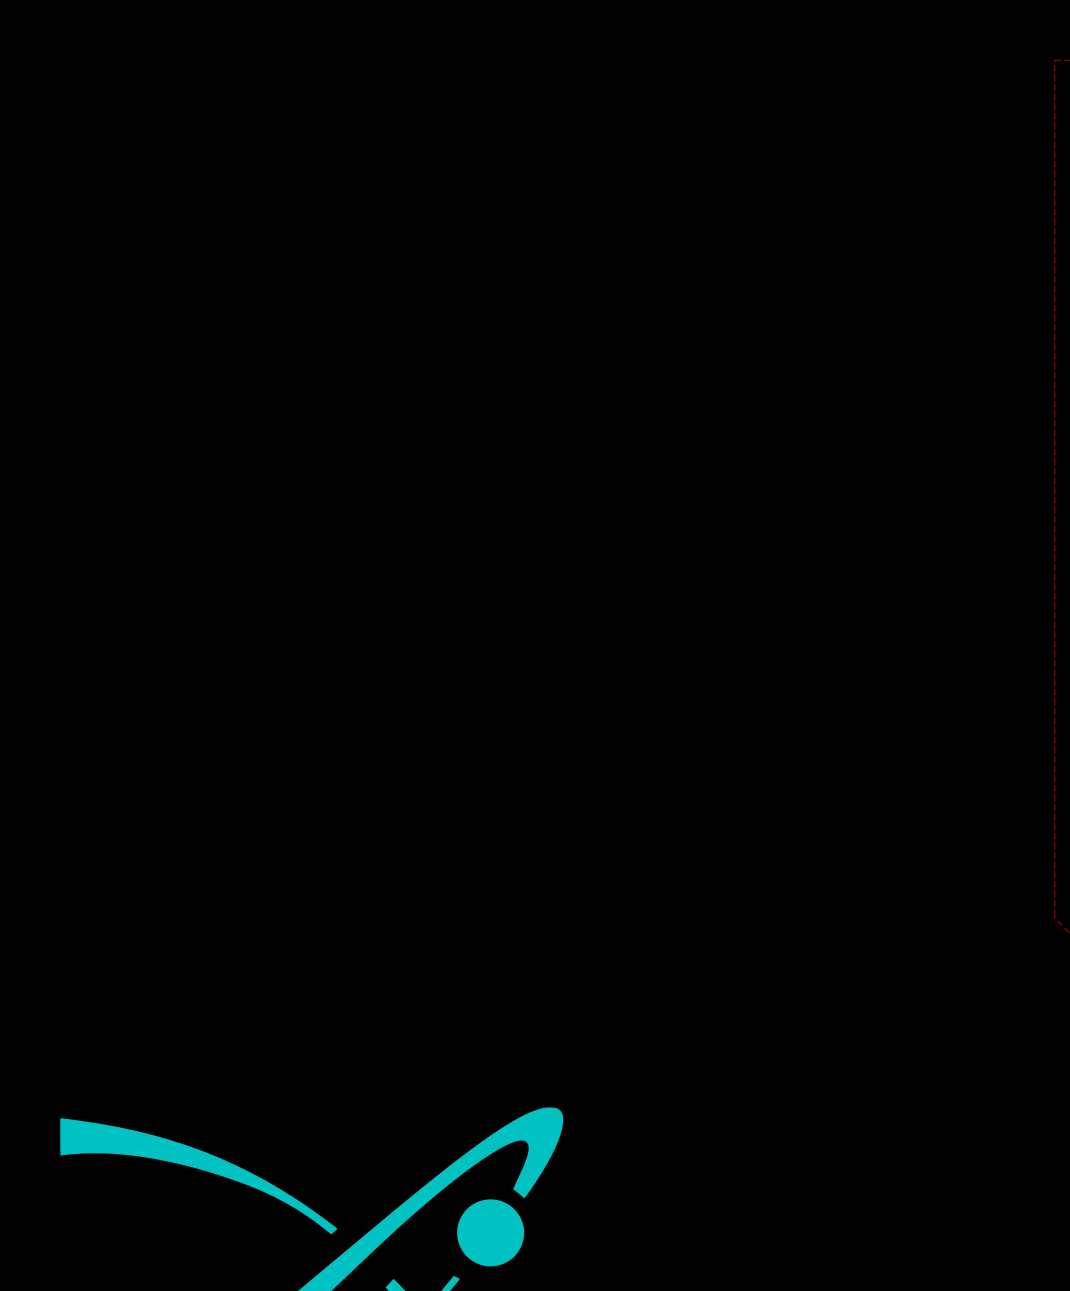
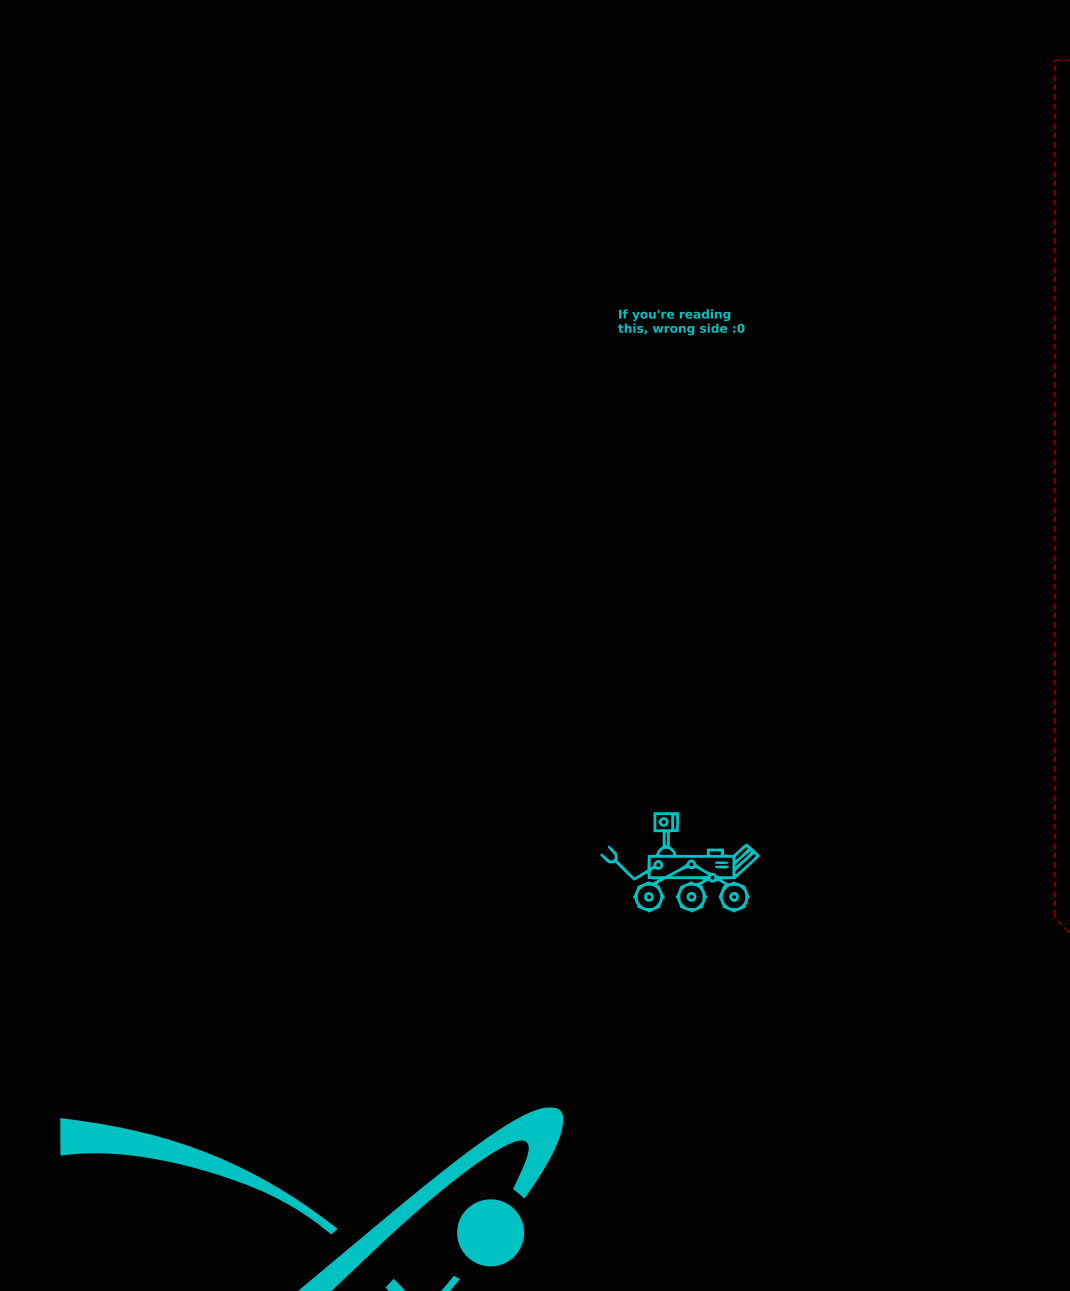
text: none -> If you're reading (674, 315)
text: none -> this, wrong side :0 (681, 329)
drawing: none -> [600, 812, 760, 913]

